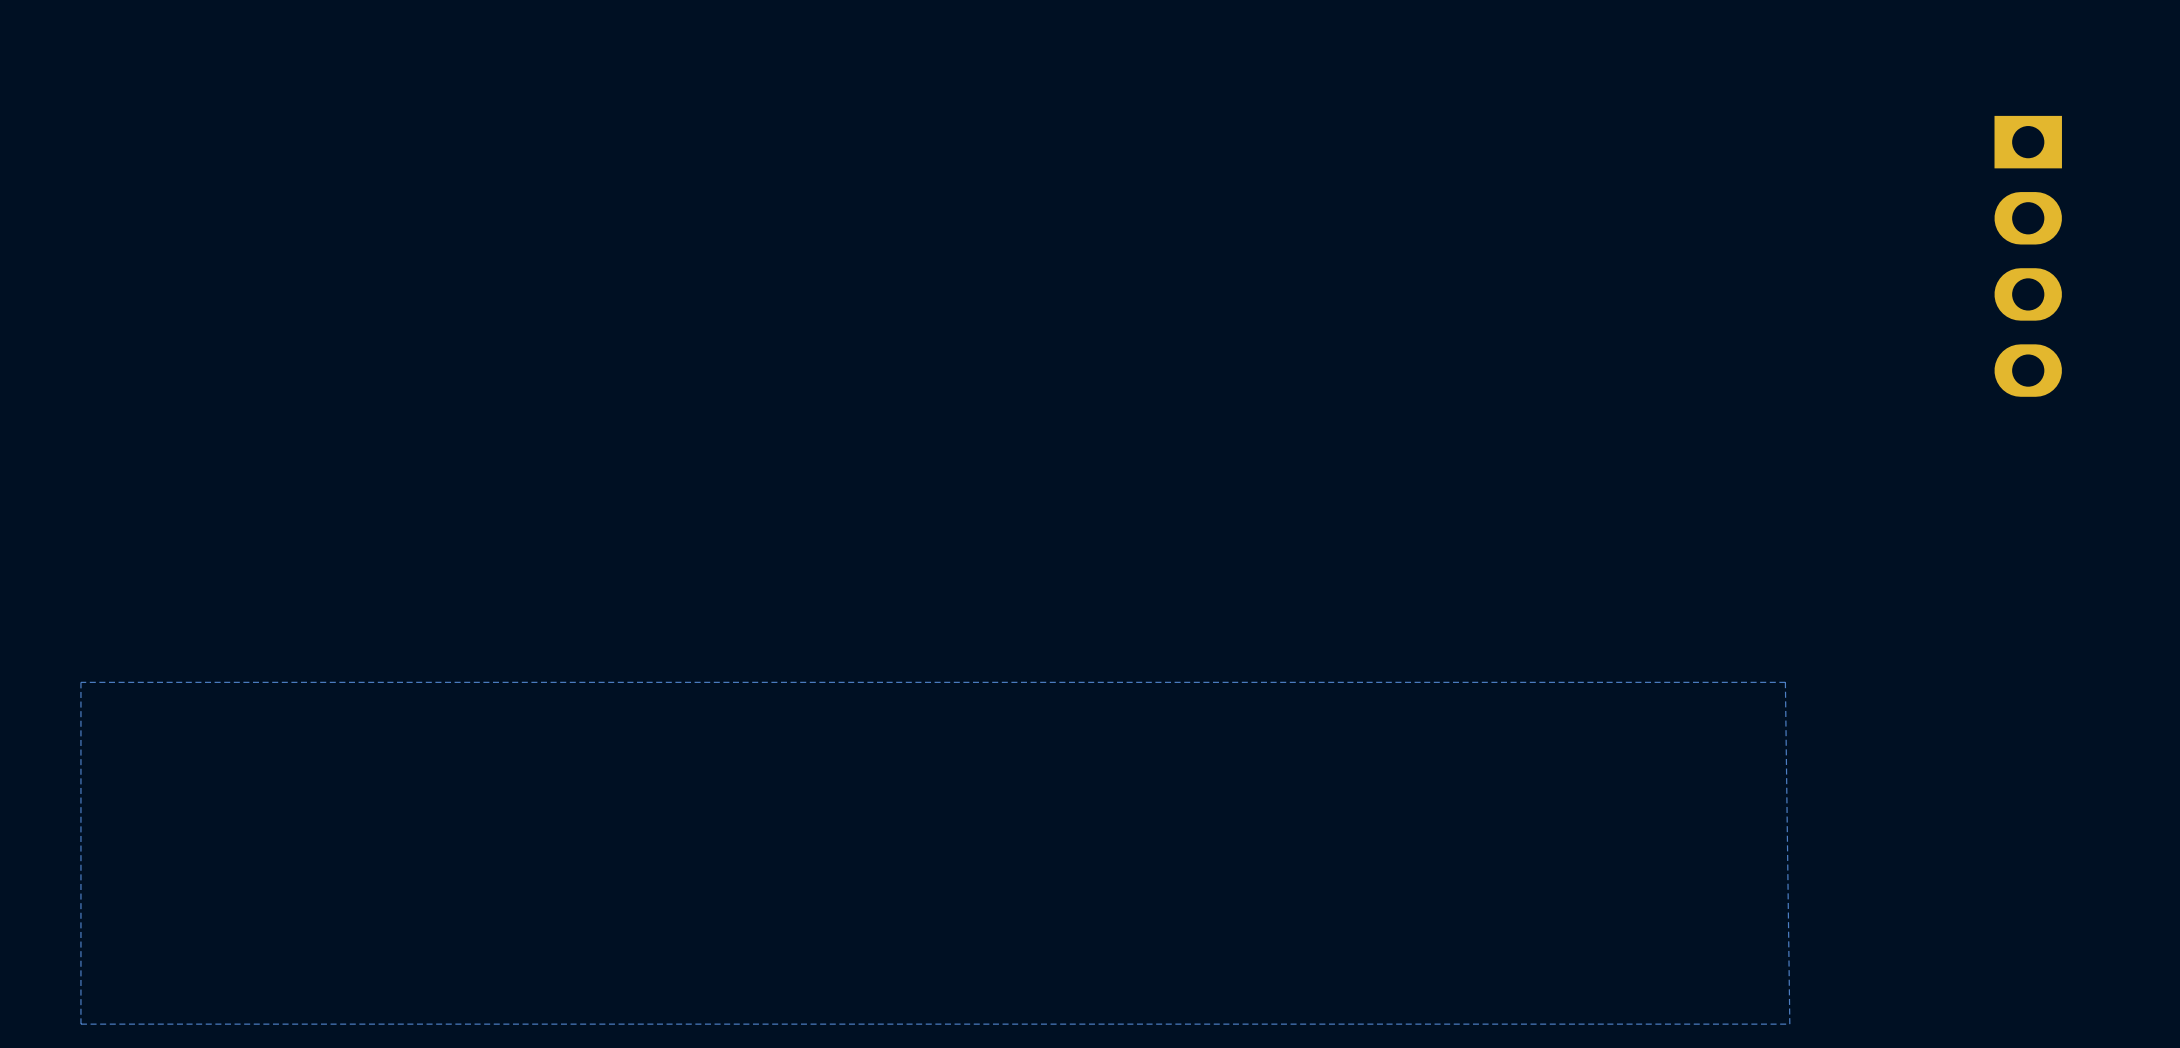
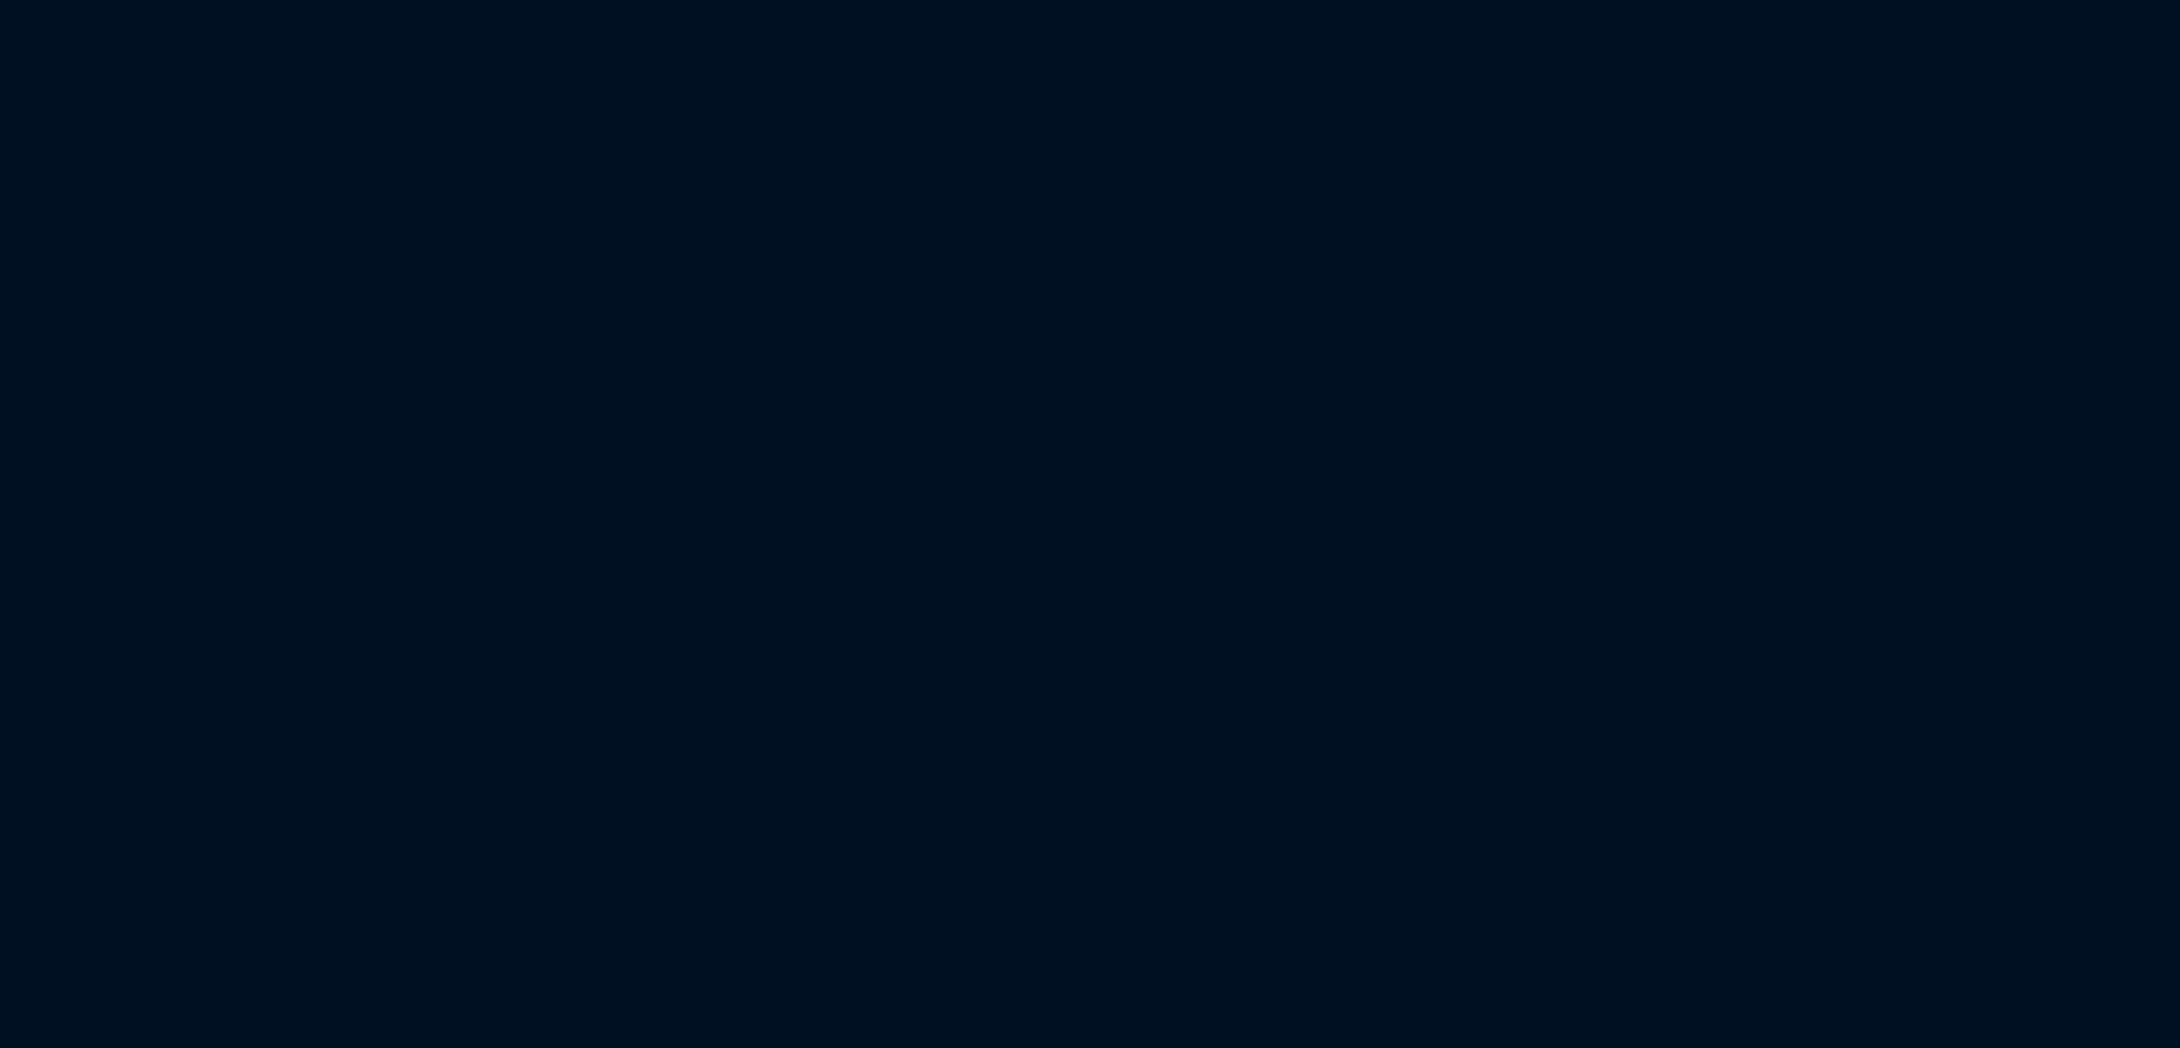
part: (2028, 256) -> none
zone outline: (1785, 682) (1789, 1024) (80, 1024) (80, 682) (1785, 682) -> none

